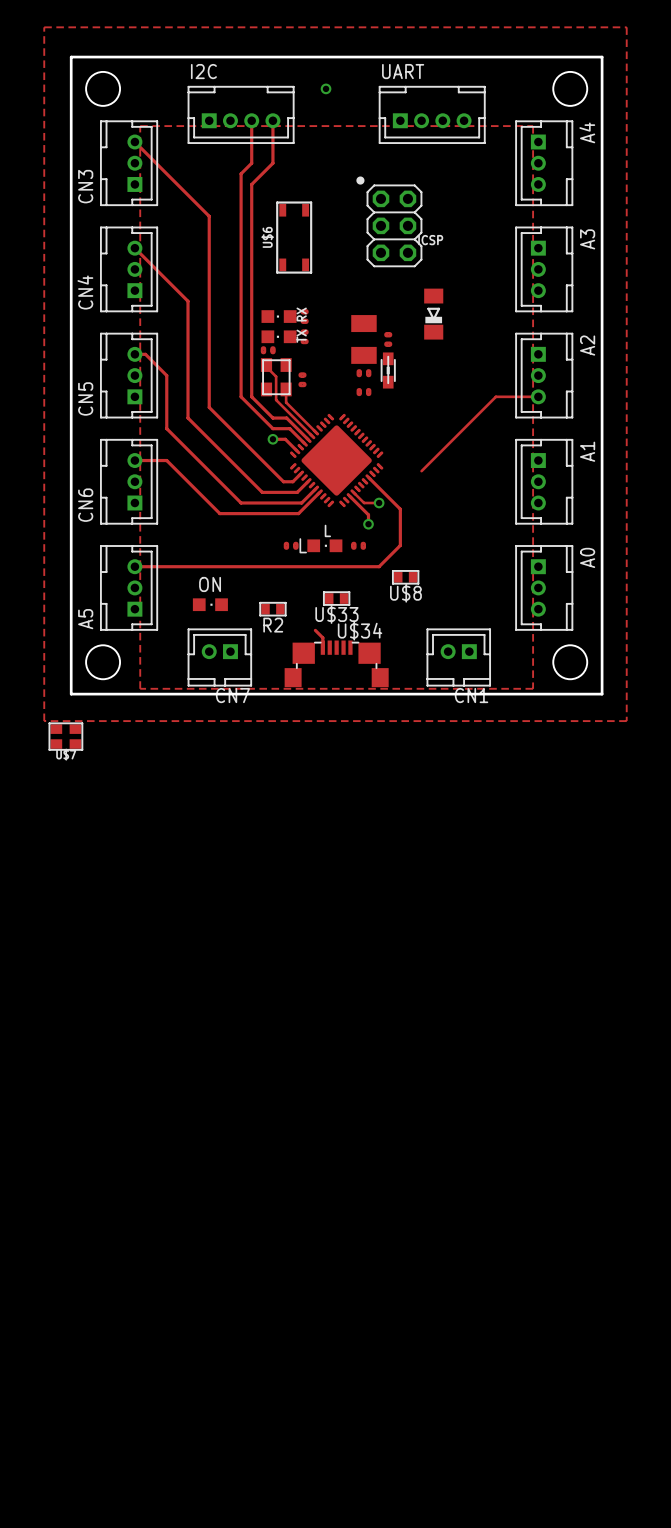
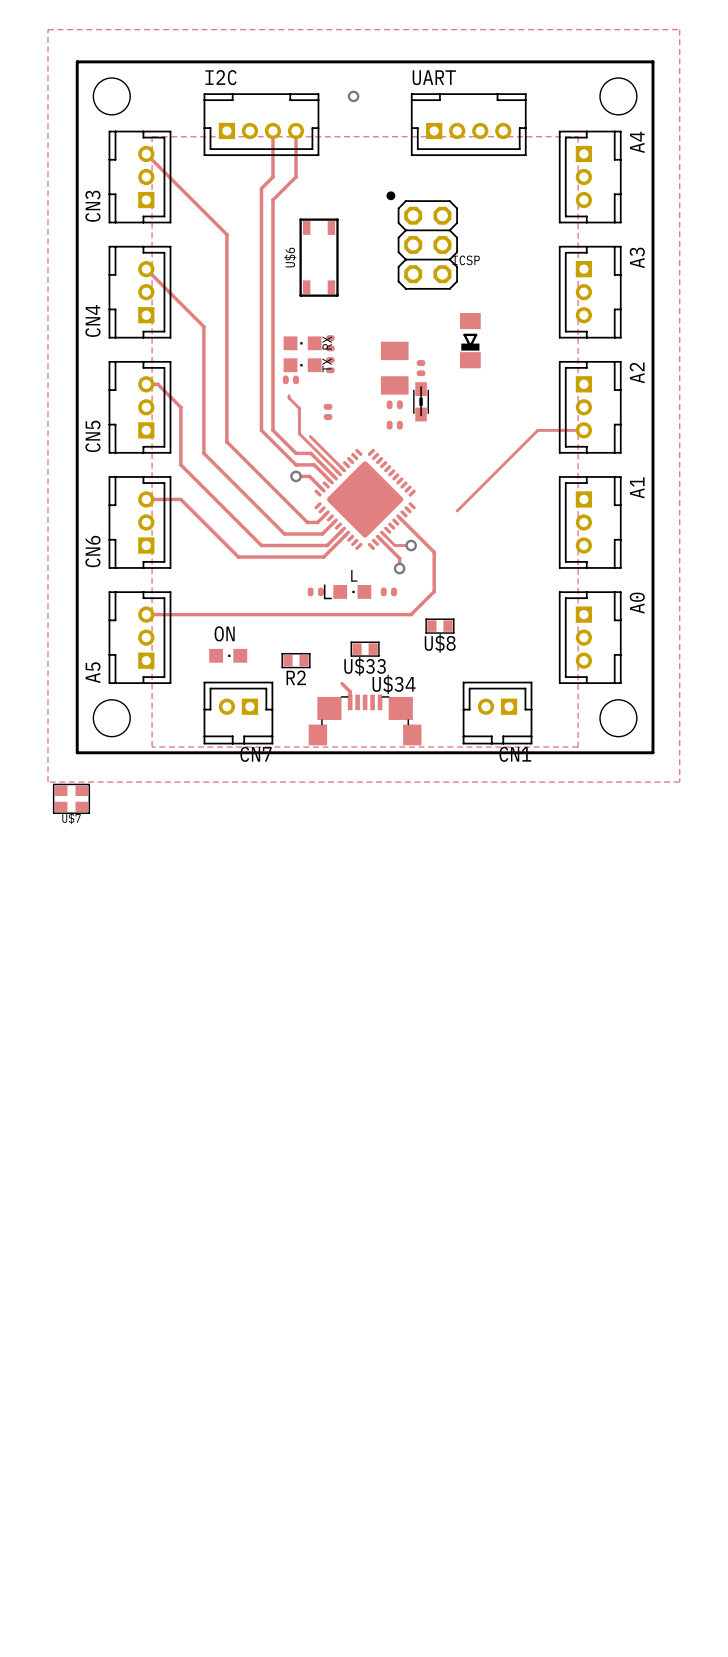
part: (276, 377) -> none
track: (286, 389) (286, 402) -> none

